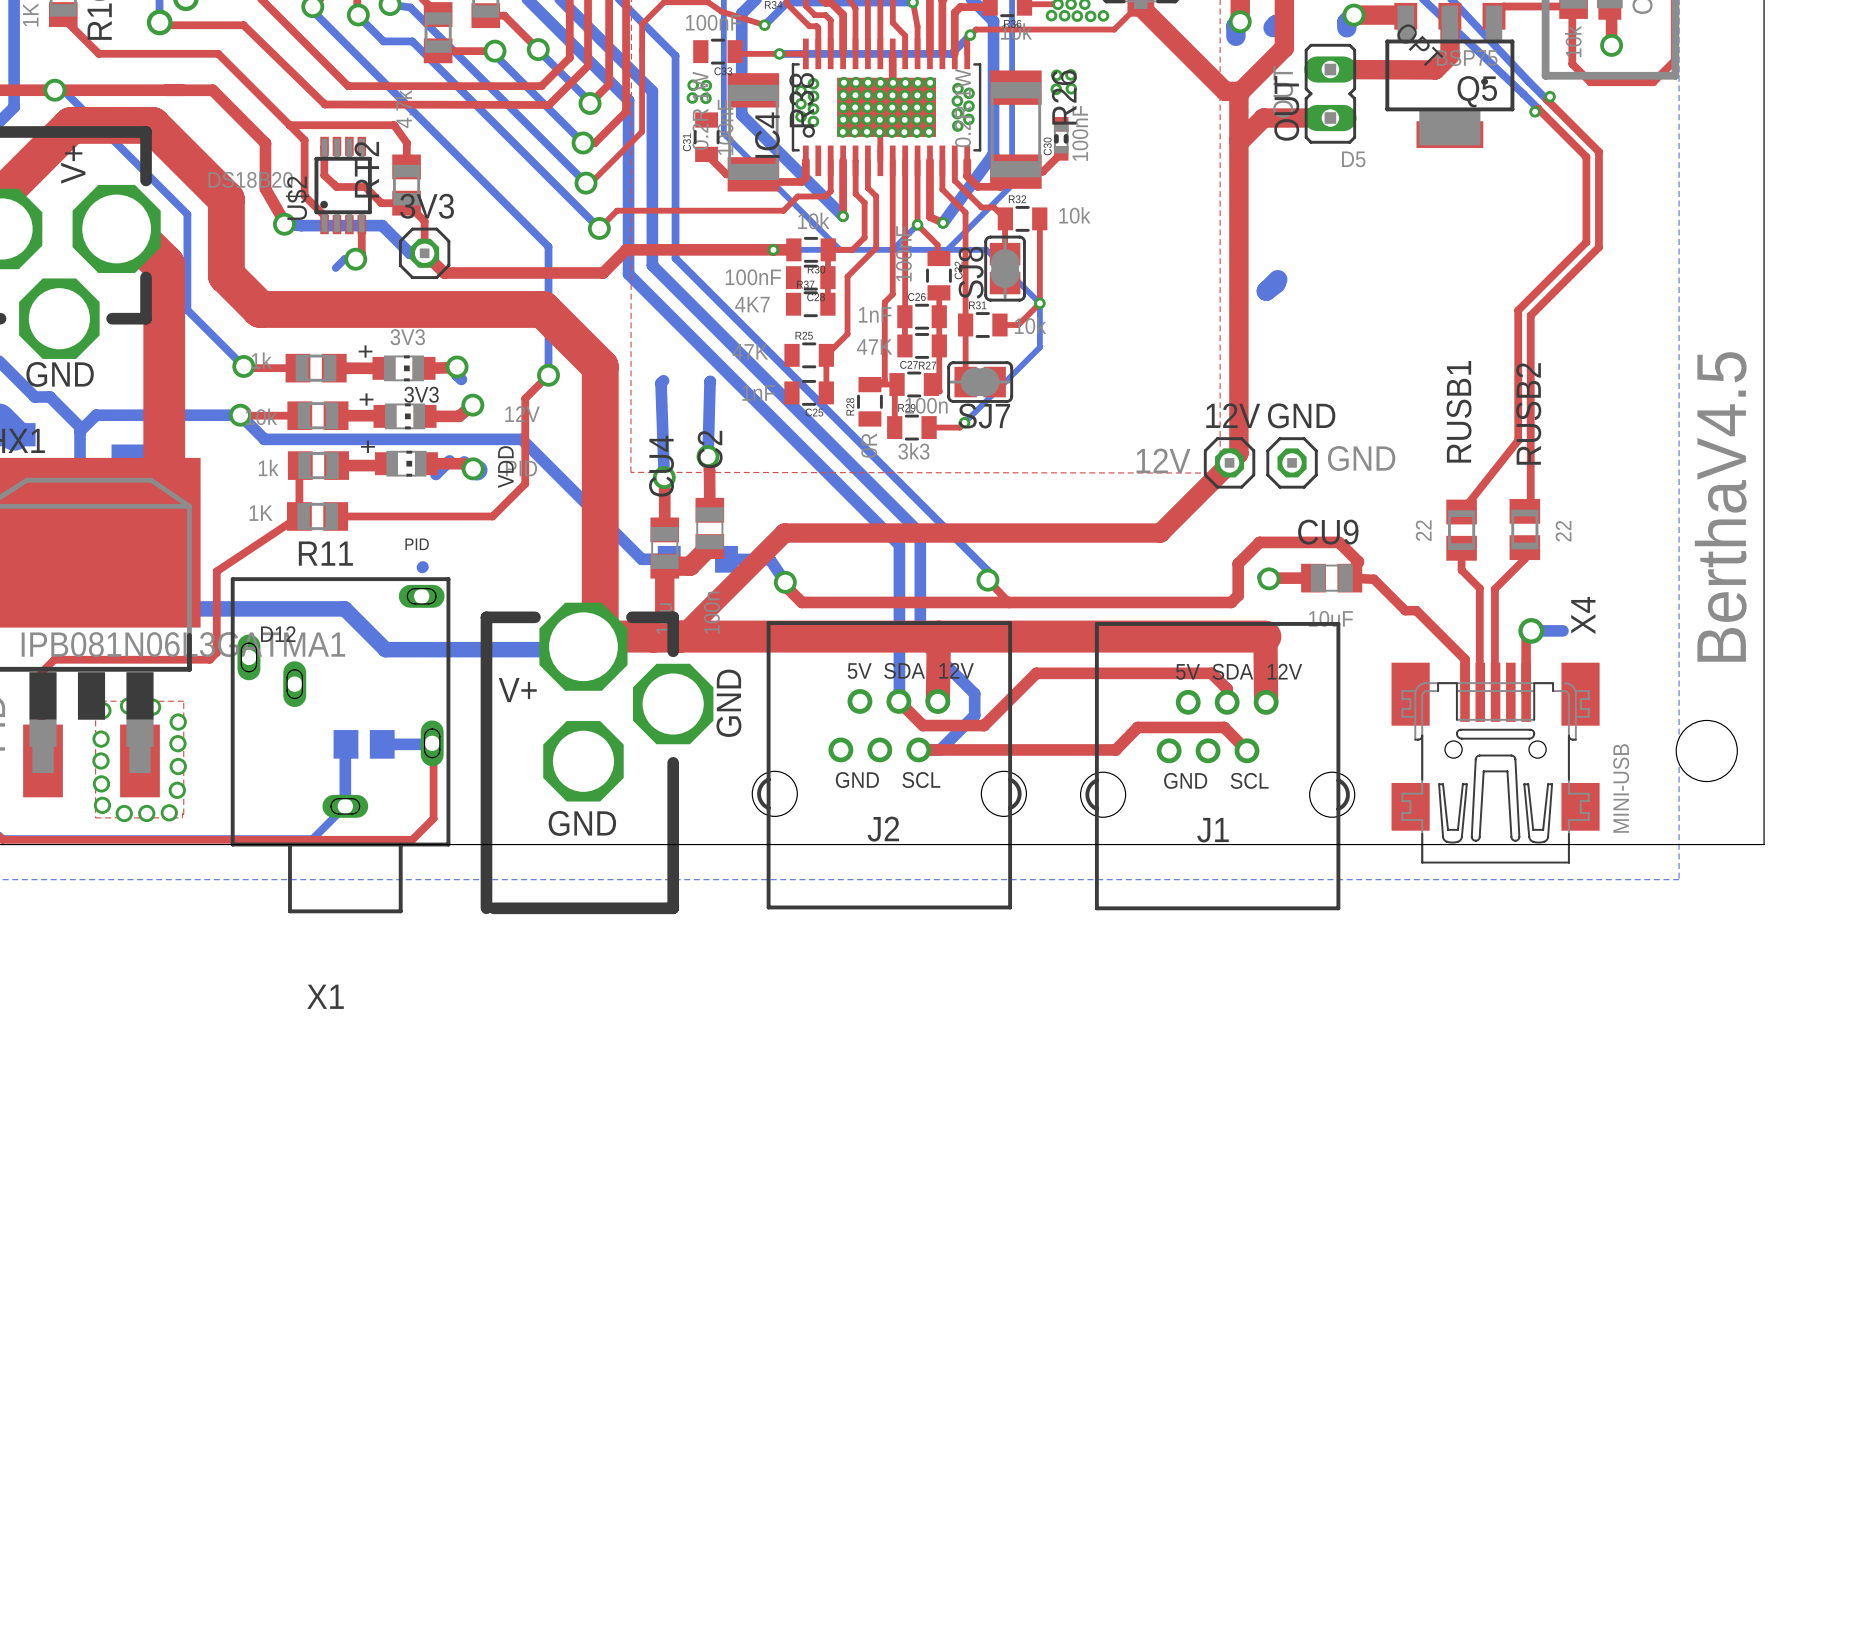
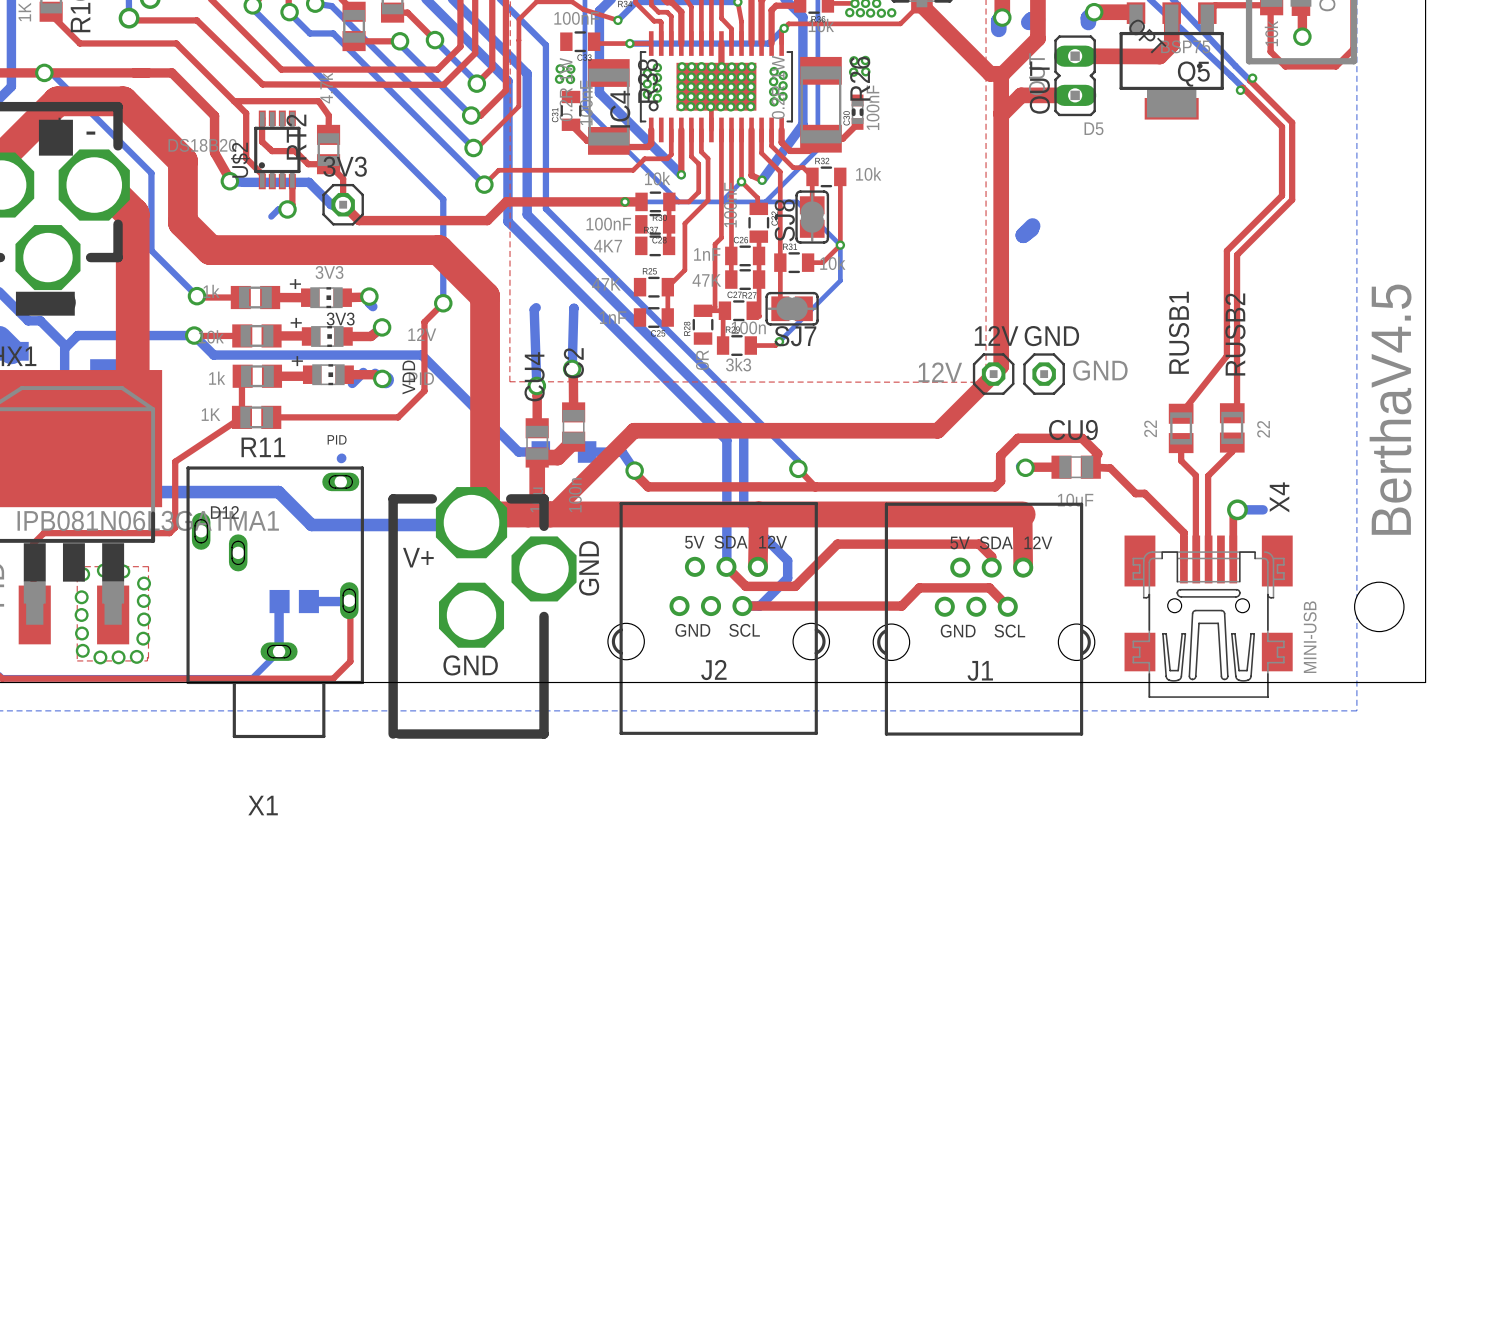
drawing: none -> [38, 119, 73, 156]
text: none -> - (90, 133)
drawing: none -> [15, 291, 75, 316]

